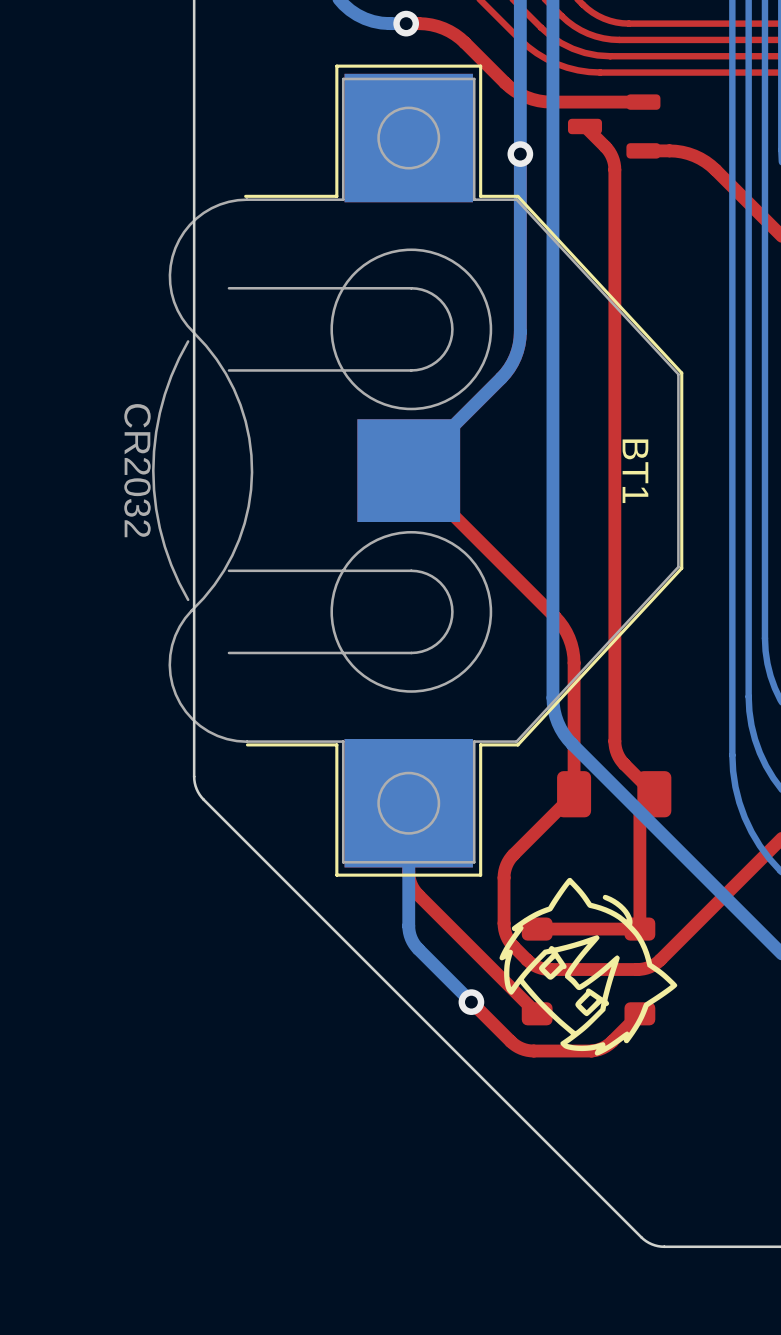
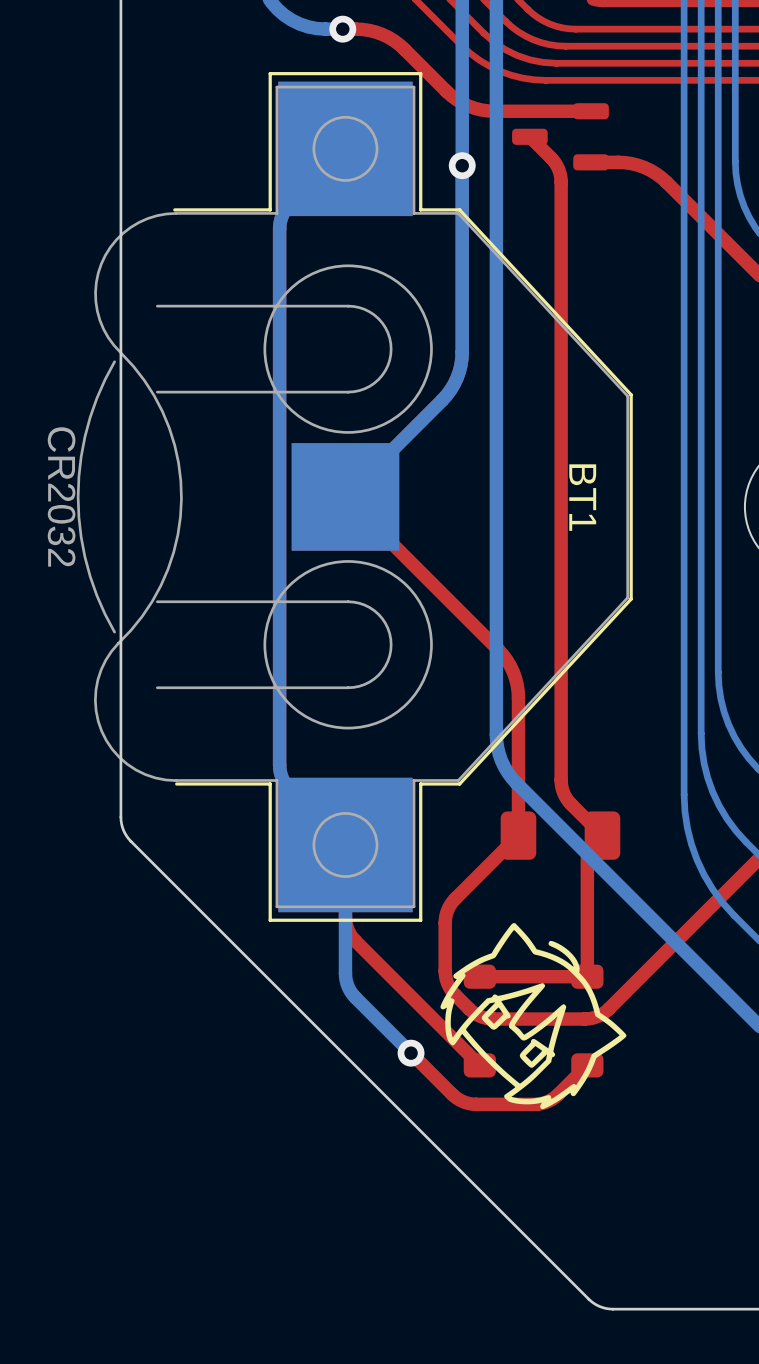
bottom track: none -> (345, 148) (287, 207) (282, 215) (279, 228) (279, 768) (287, 786) (345, 845)

